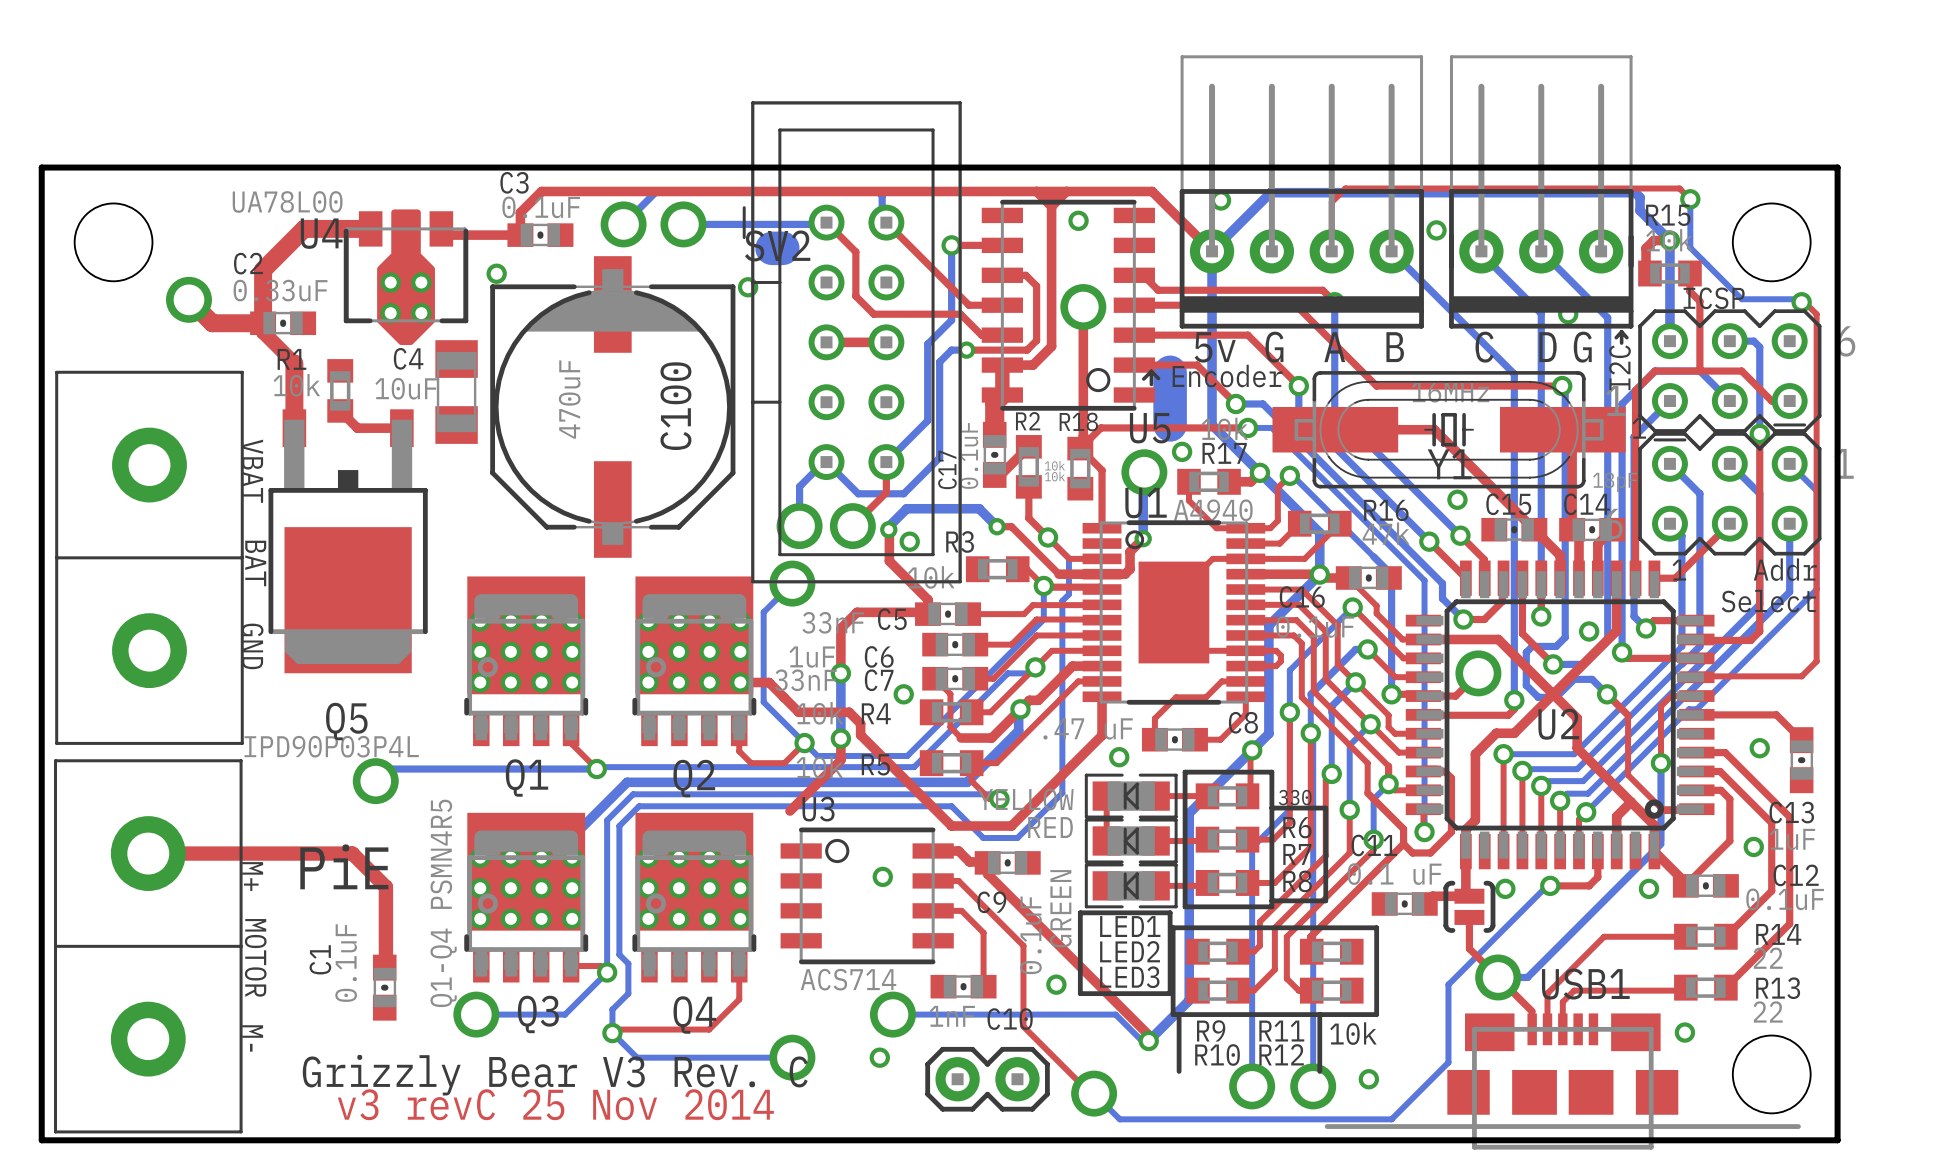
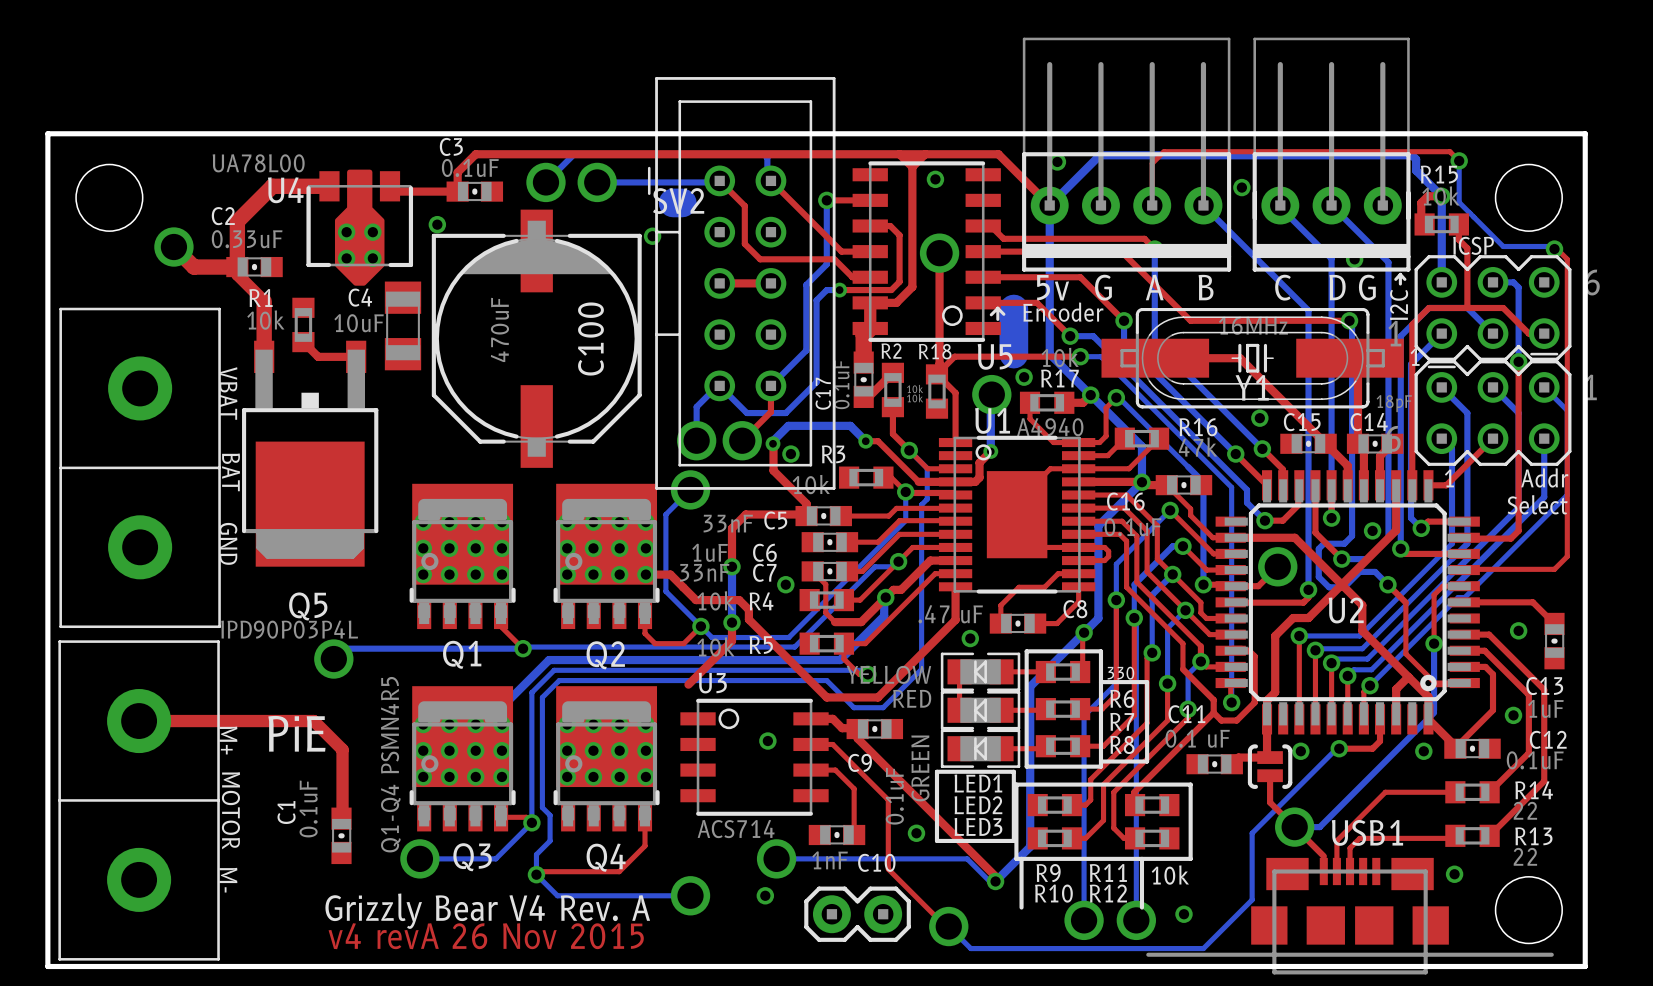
text: Grizzly Bear V3 Rev. C (555, 1075) -> Grizzly Bear V4 Rev. A (487, 911)
text: v3 revC 25 Nov 2014 (555, 1104) -> v4 revA 26 Nov 2015 (486, 936)

